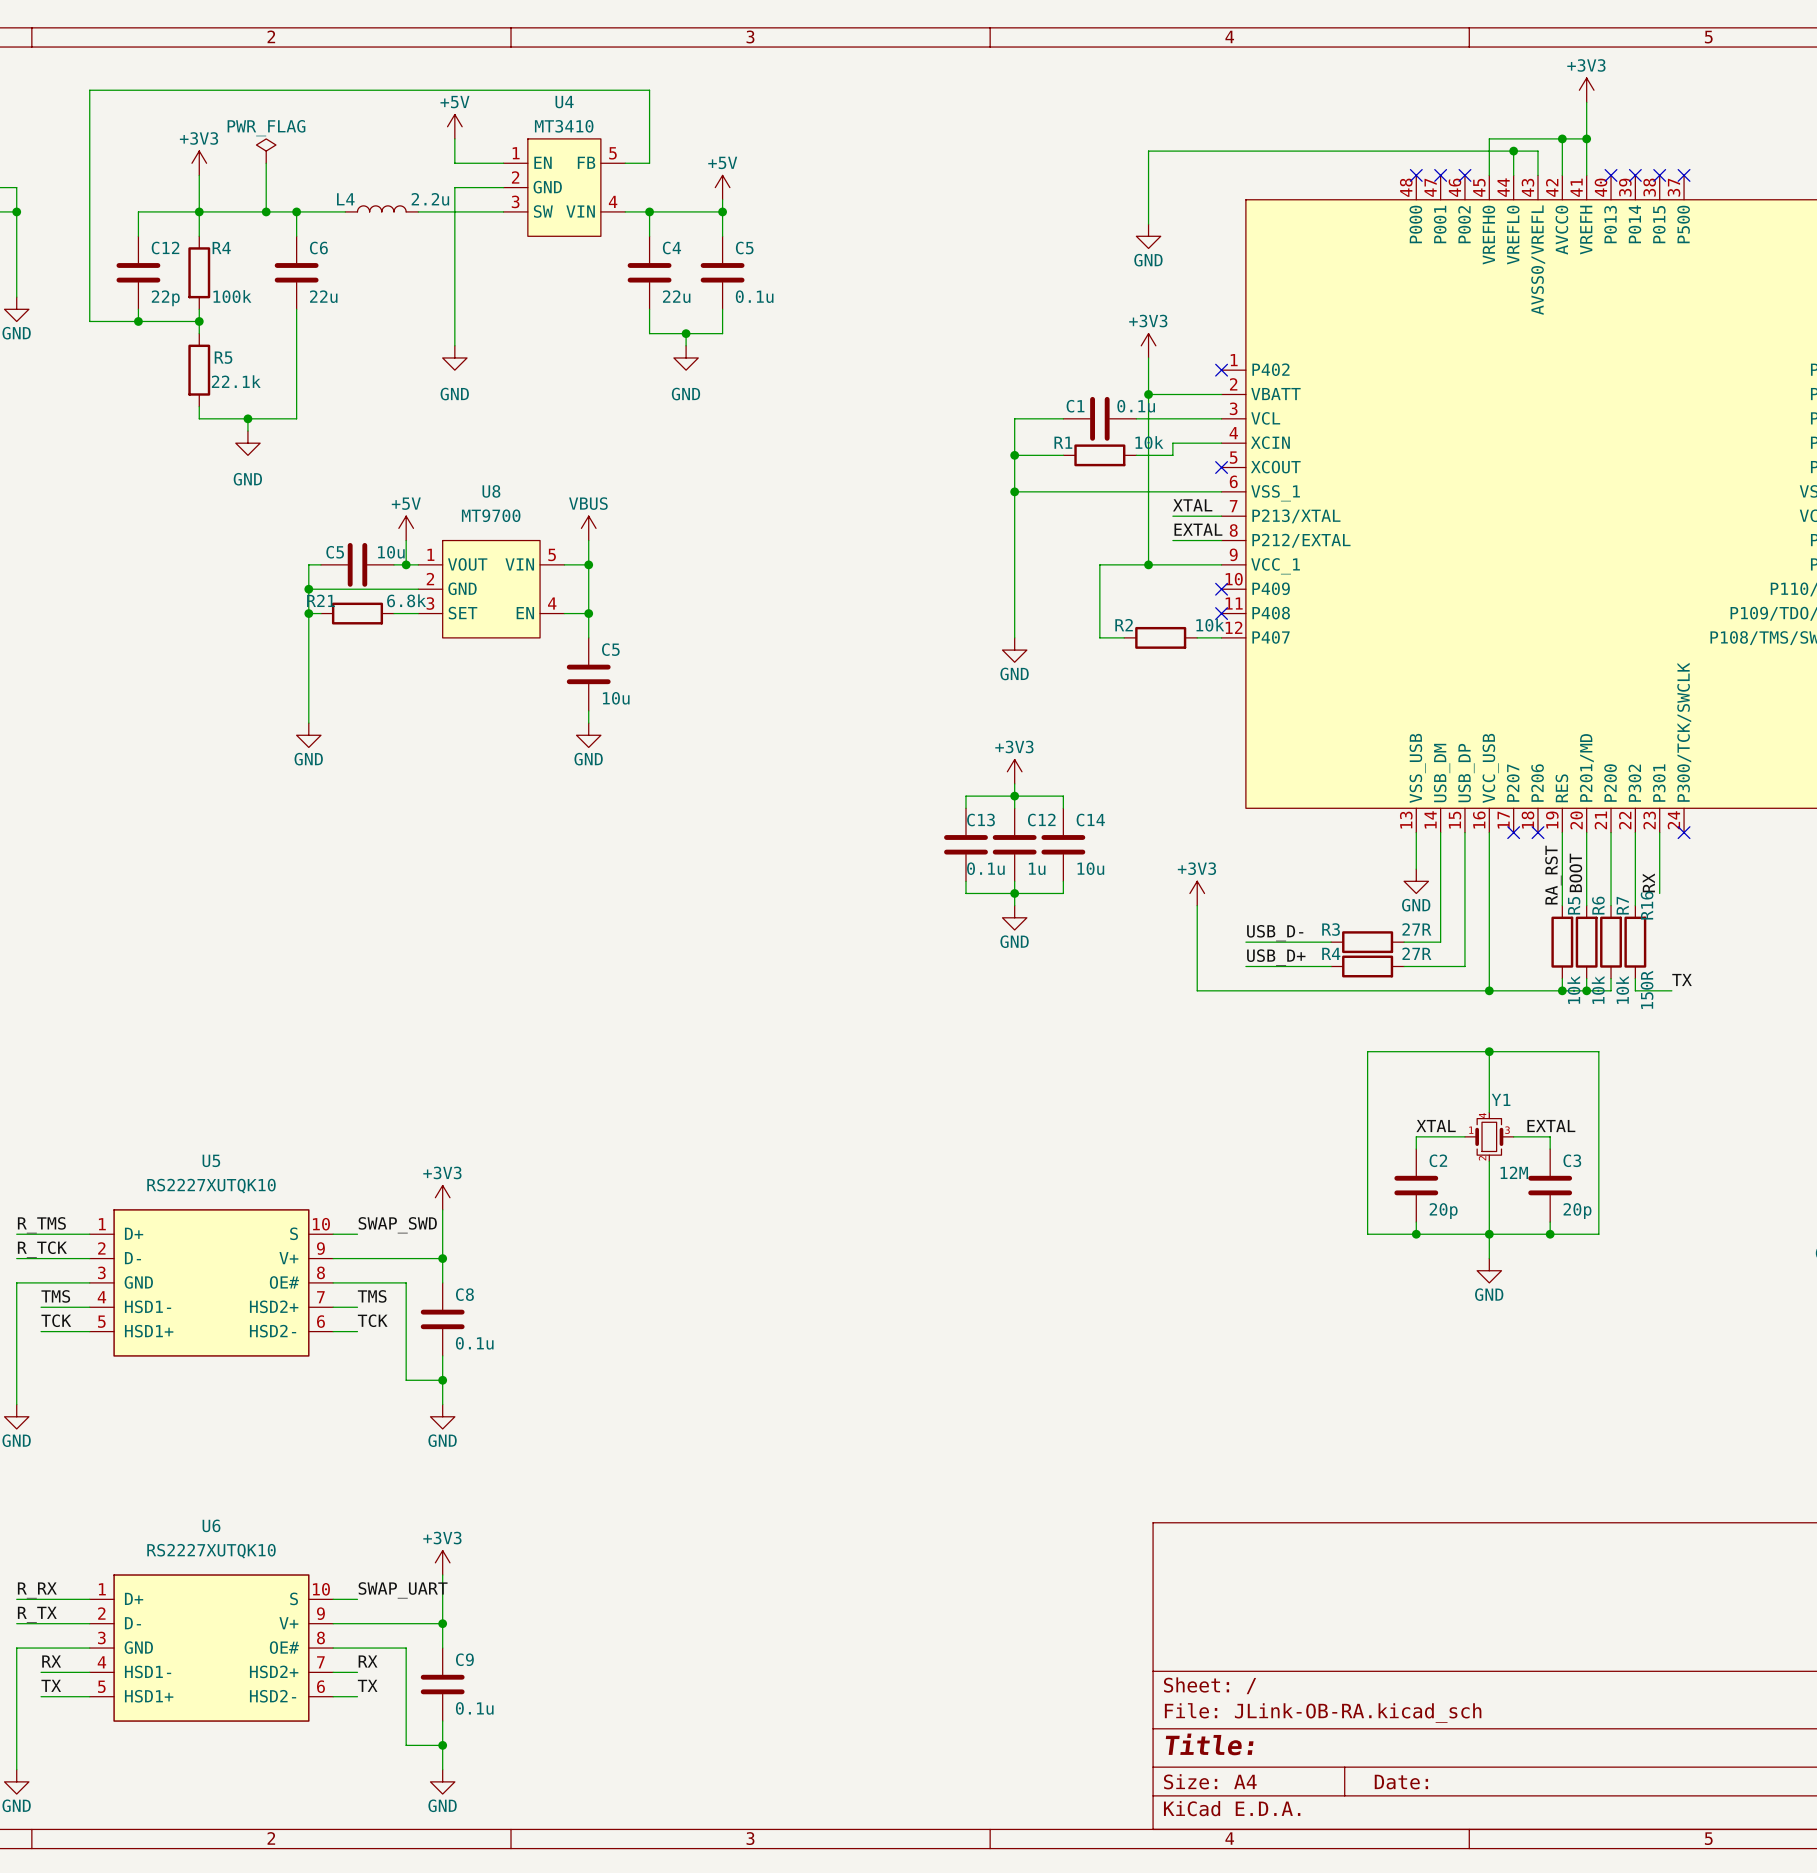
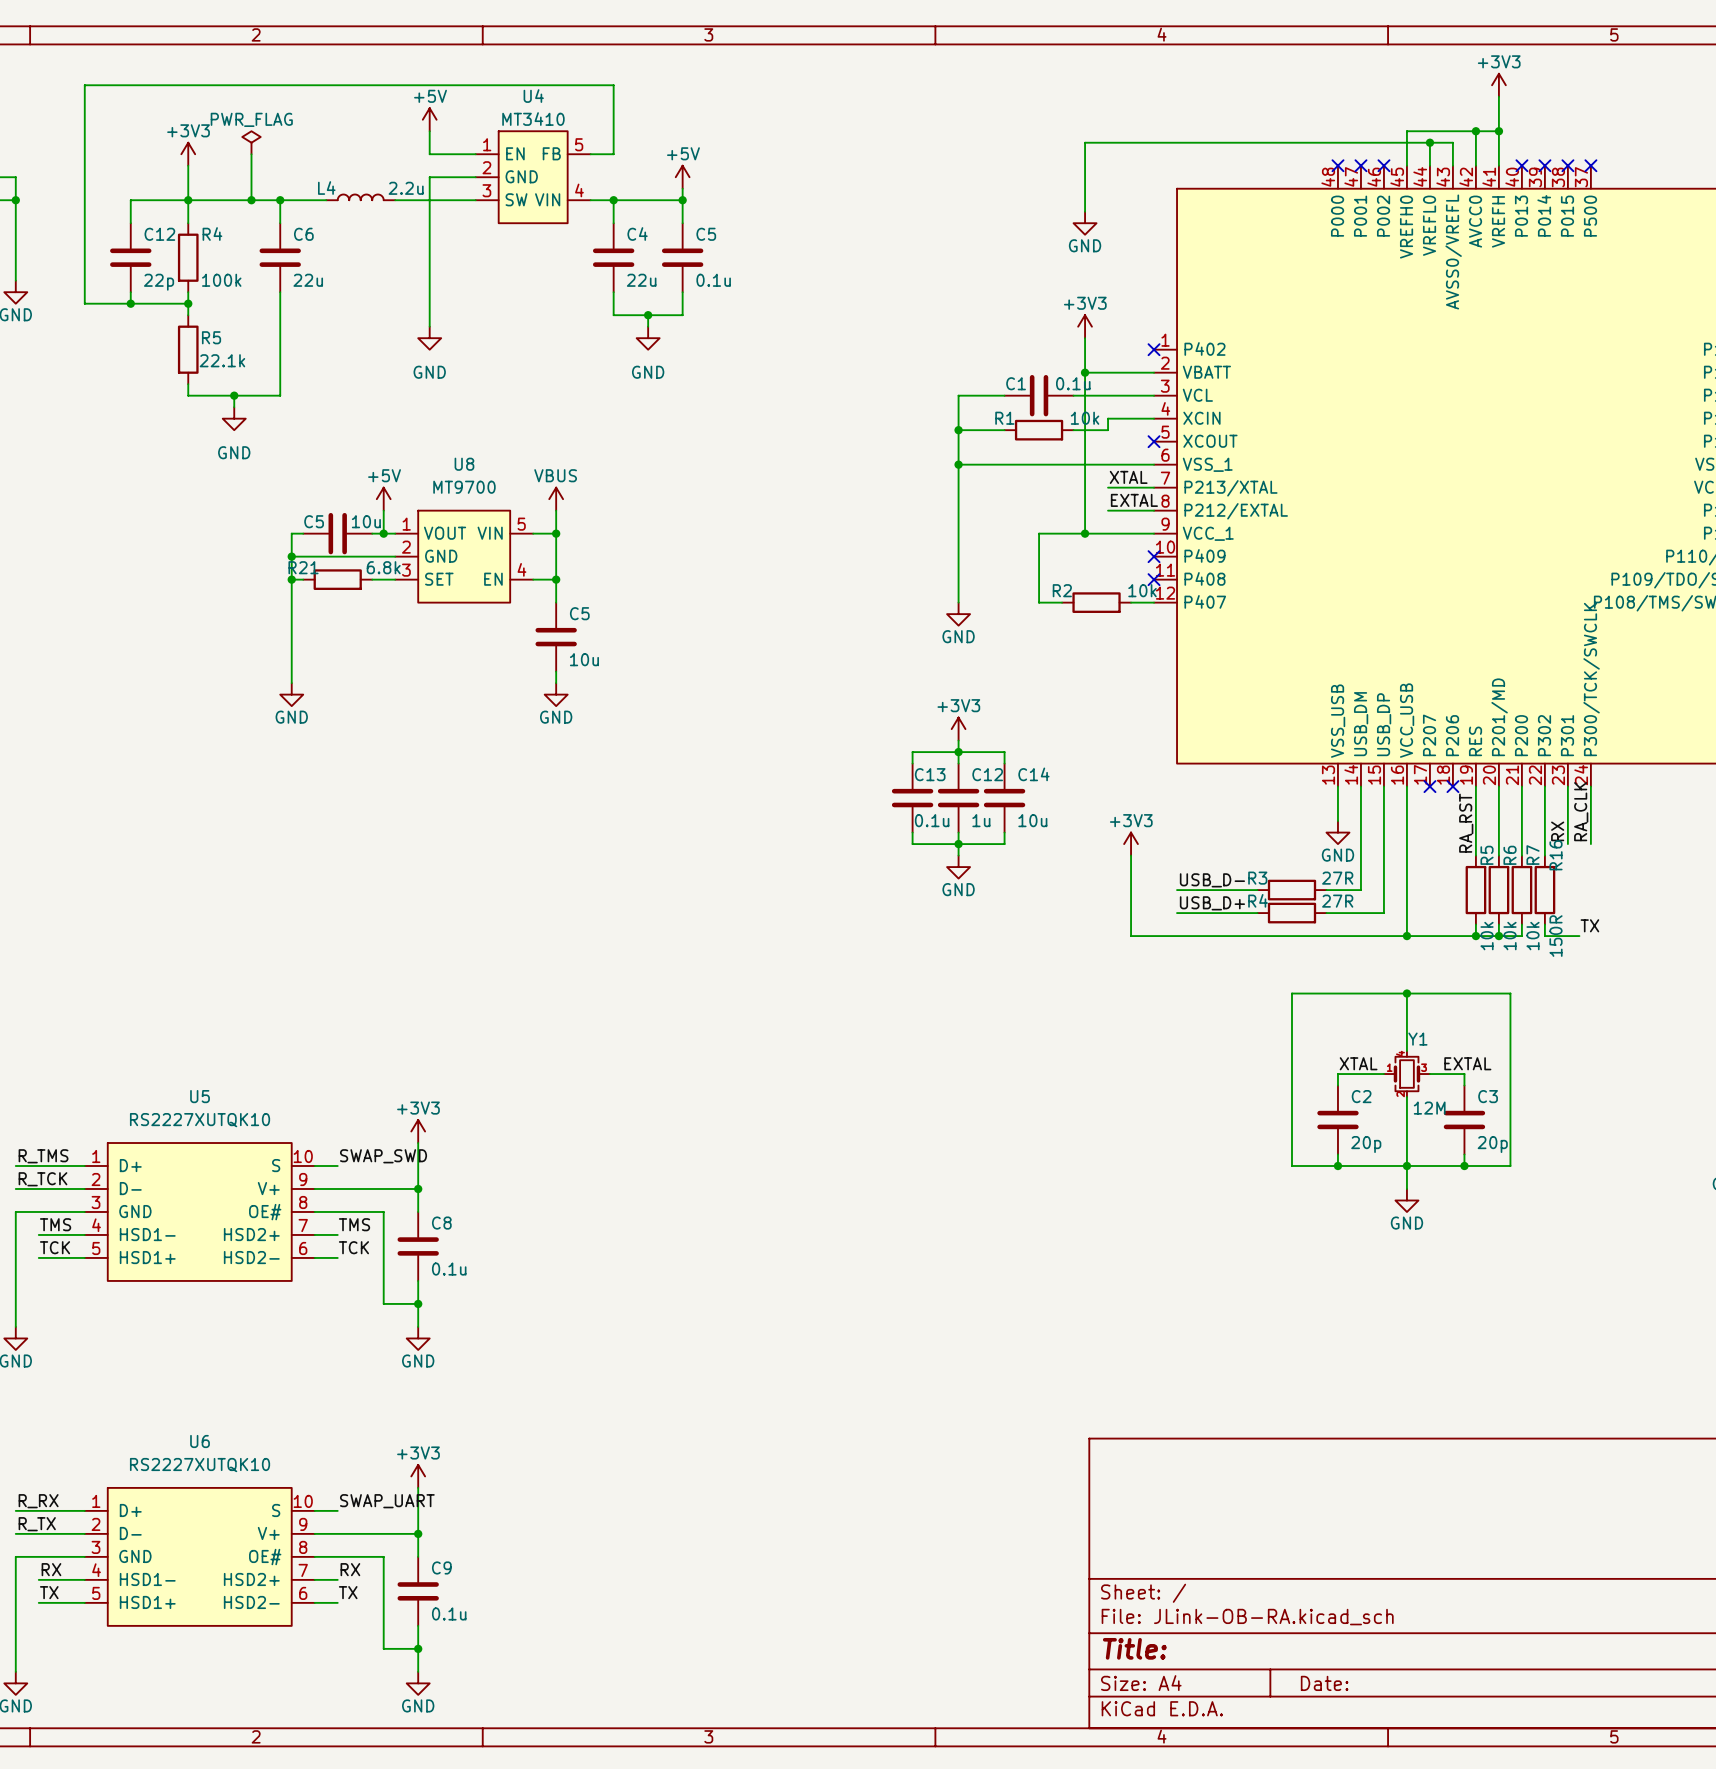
wire: none -> (1590, 786) (1590, 844)
no-connect mark: (1684, 832) -> none
label: none -> RA_CLK (1581, 811)
label: BOOT (1575, 872) -> none

